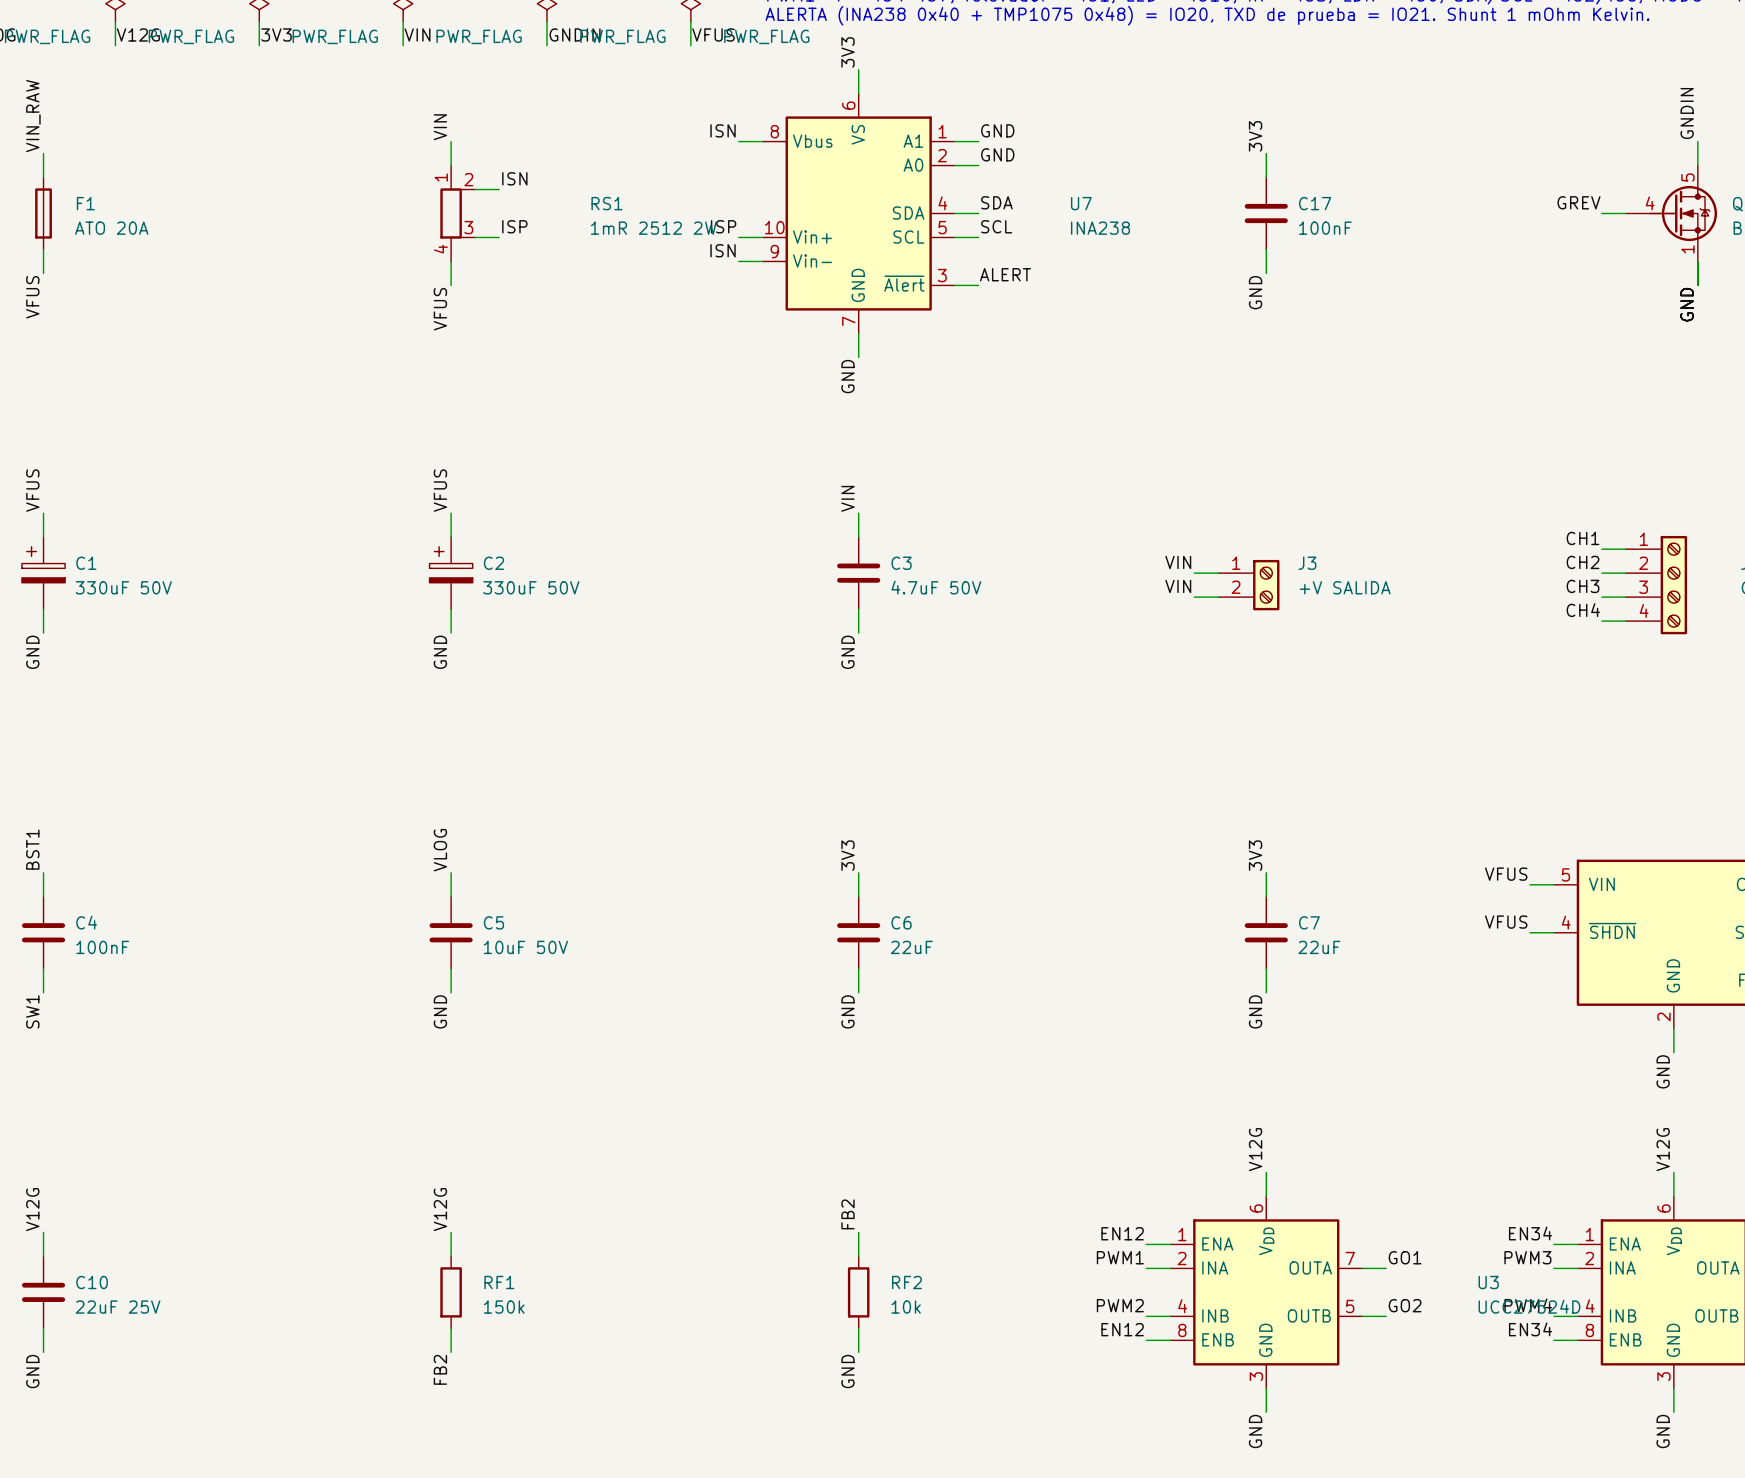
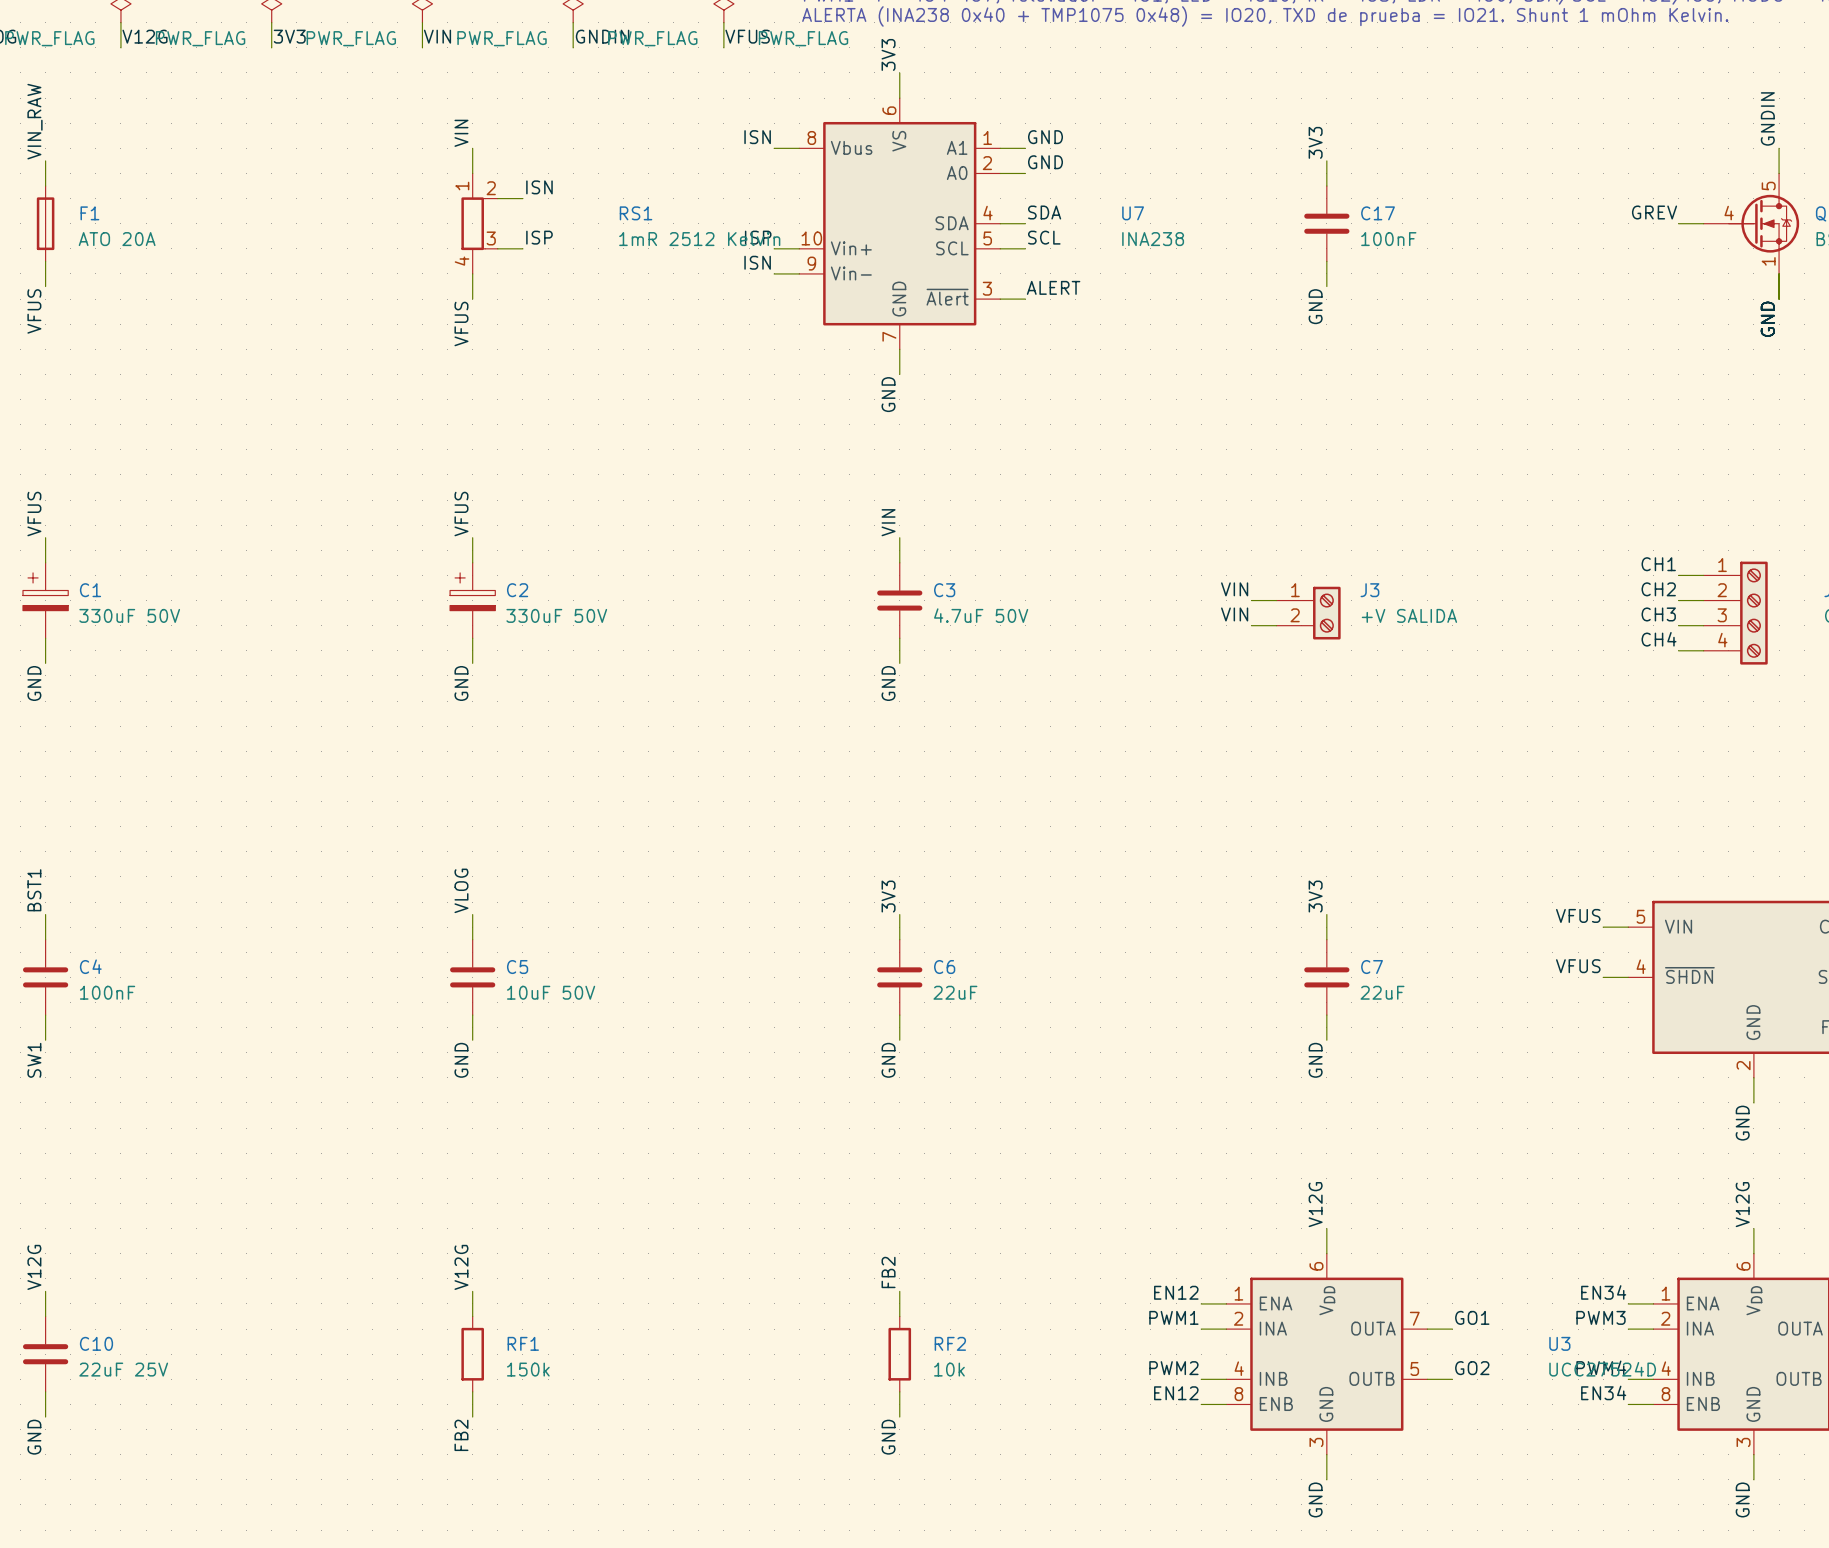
RS1 value: 1mR 2512 2W (653, 228) -> 1mR 2512 Kelvin (699, 239)

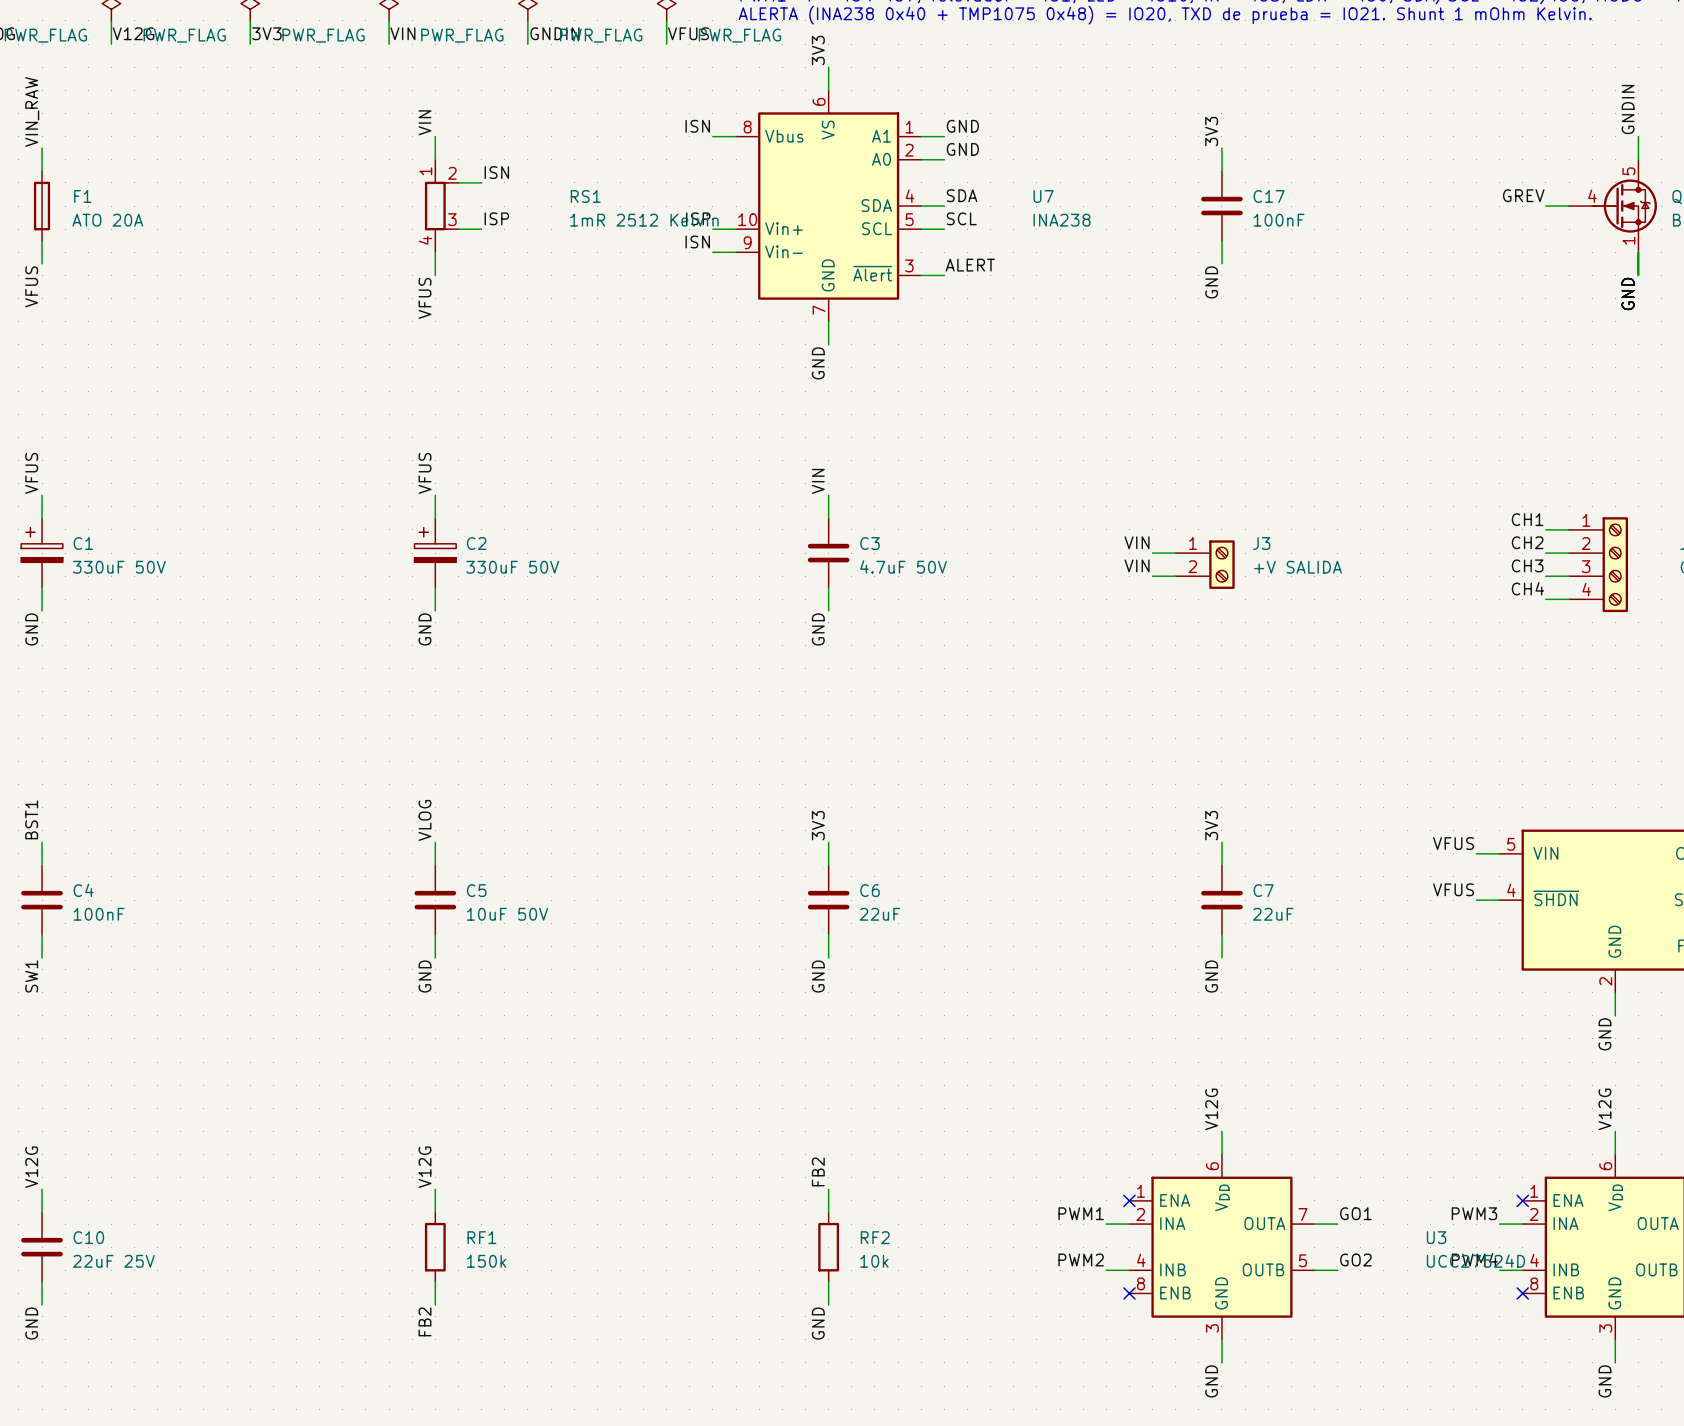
label: EN12 (1176, 1292) -> none
label: EN34 (1603, 1292) -> none
wire: (1201, 1303) (1226, 1303) -> none
no-connect mark: none -> (1129, 1200)
wire: (1628, 1303) (1653, 1303) -> none
no-connect mark: none -> (1522, 1200)
label: EN34 (1603, 1392) -> none
label: EN12 (1176, 1393) -> none
wire: (1201, 1404) (1226, 1404) -> none
no-connect mark: none -> (1129, 1293)
wire: (1628, 1404) (1653, 1404) -> none
no-connect mark: none -> (1522, 1293)

